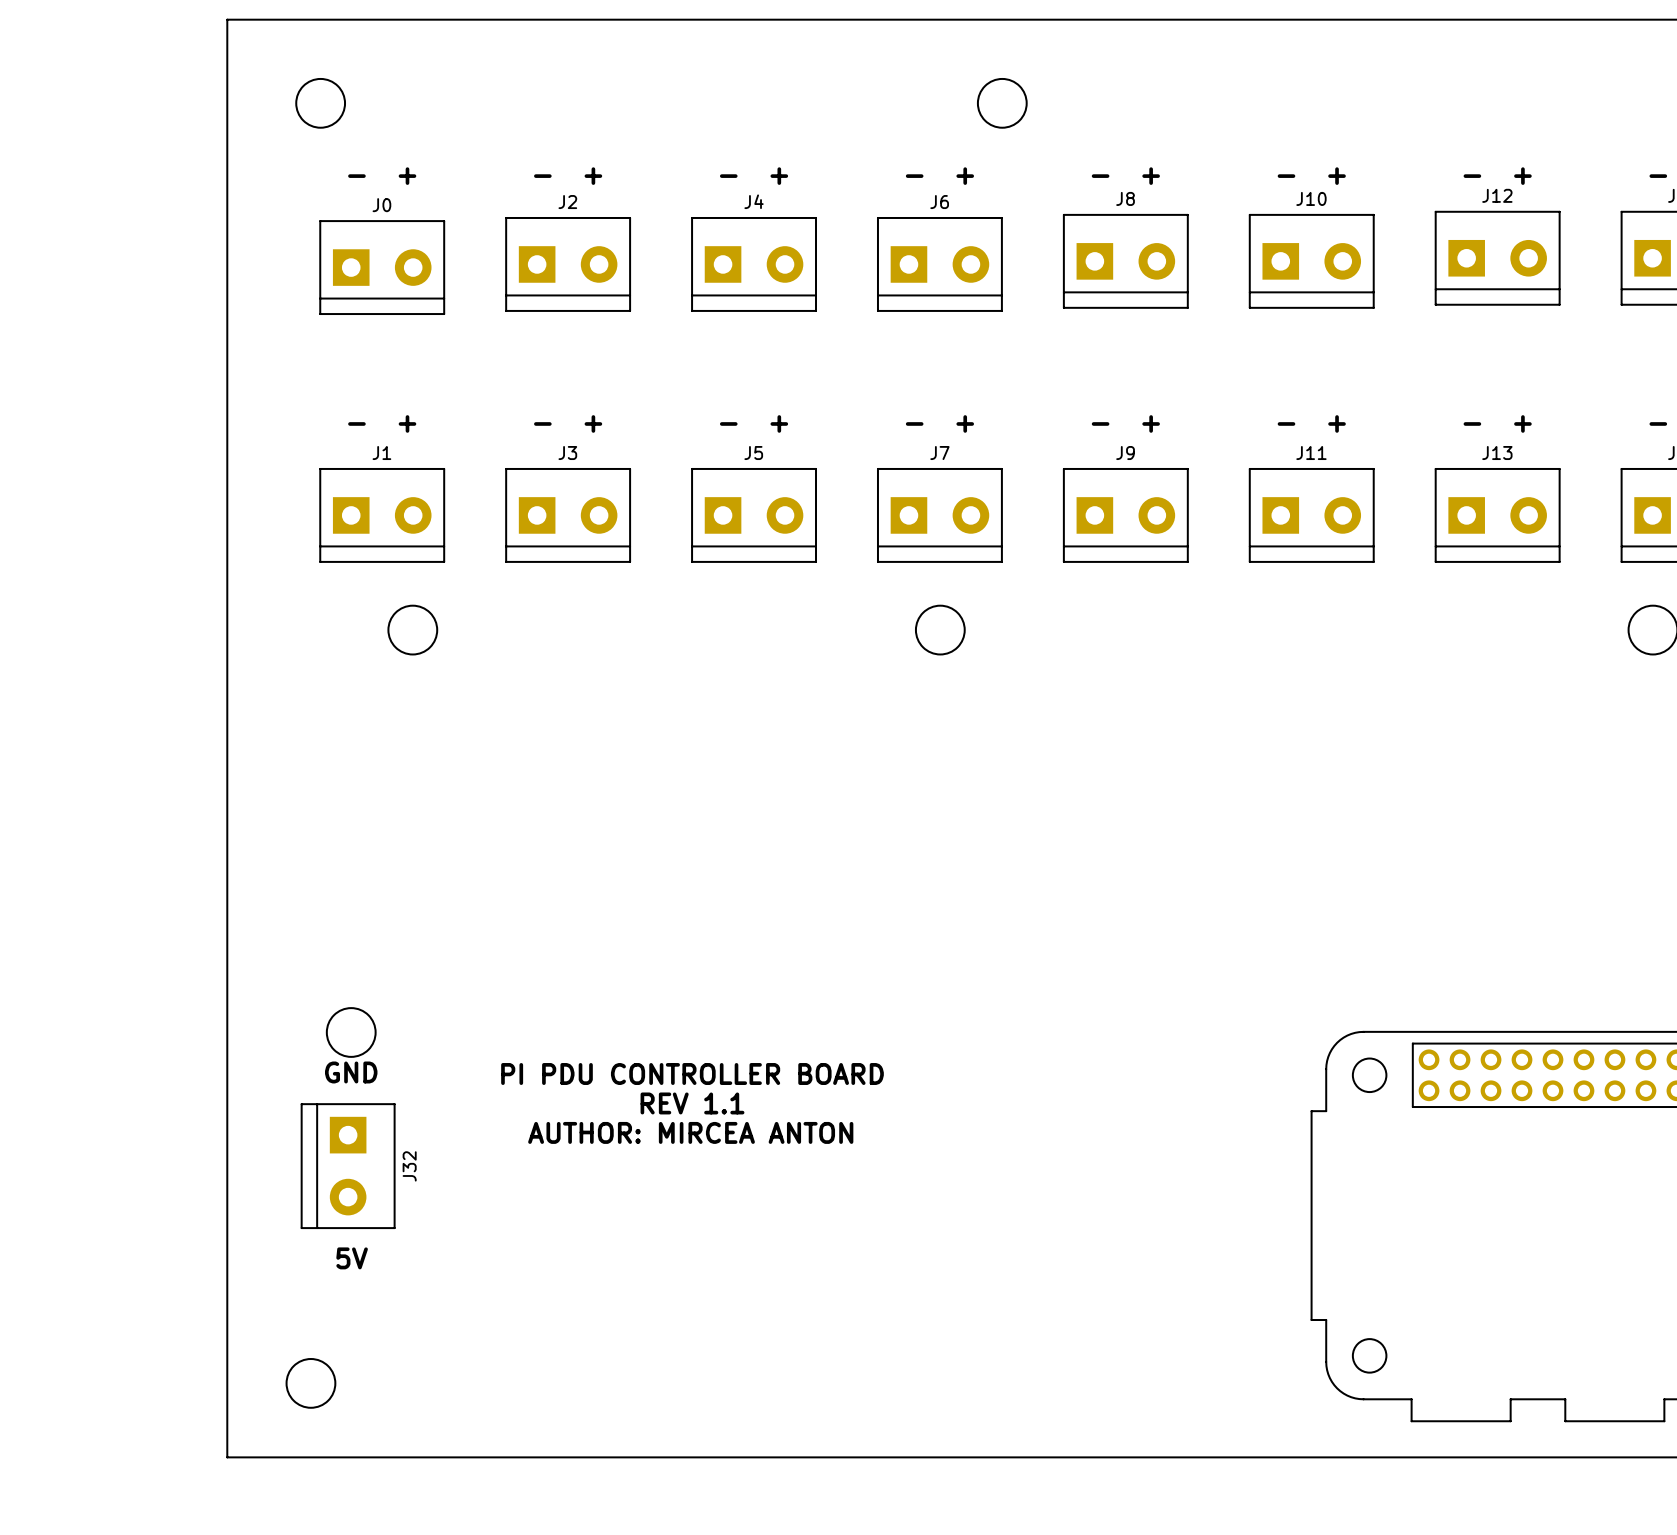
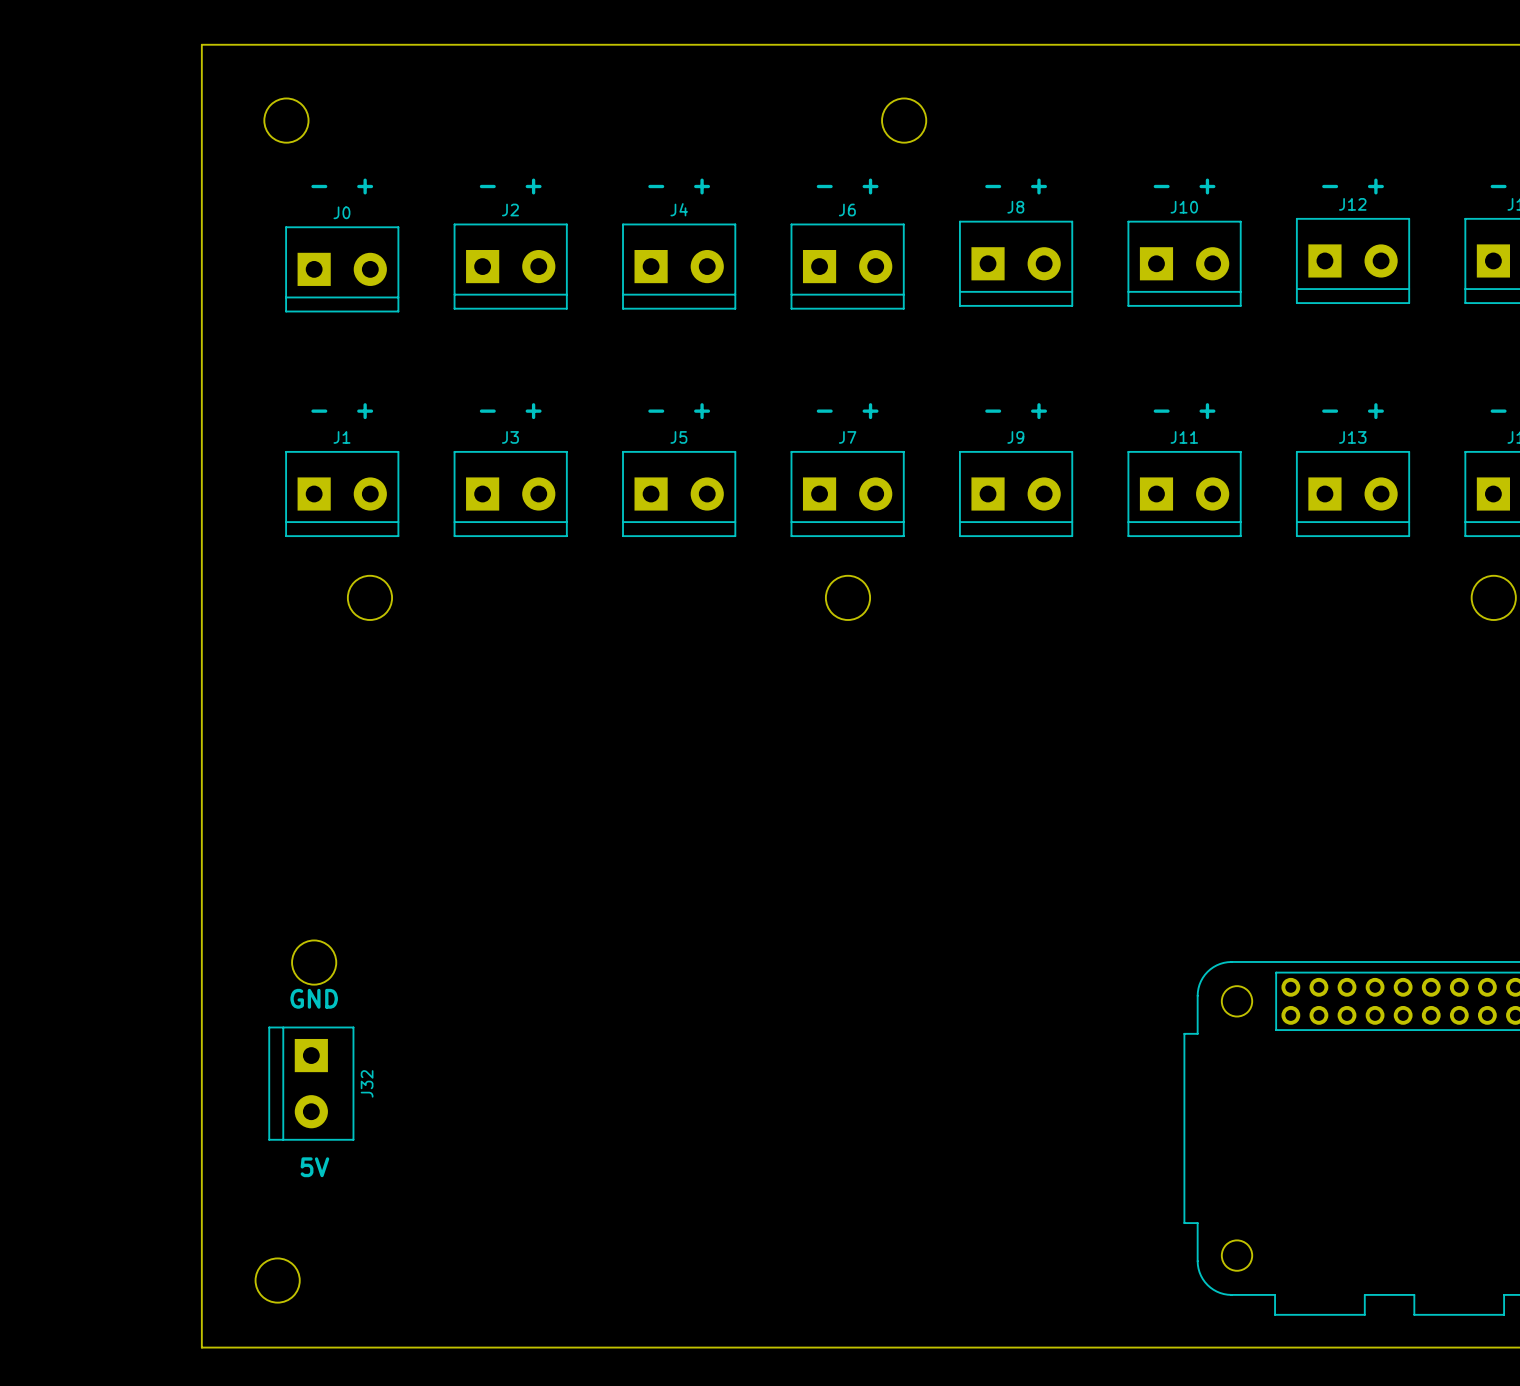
text: PI PDU CONTROLLER BOARD (692, 1074) -> none
text: REV 1.1 (692, 1103) -> none
text: AUTHOR: MIRCEA ANTON (690, 1132) -> none

